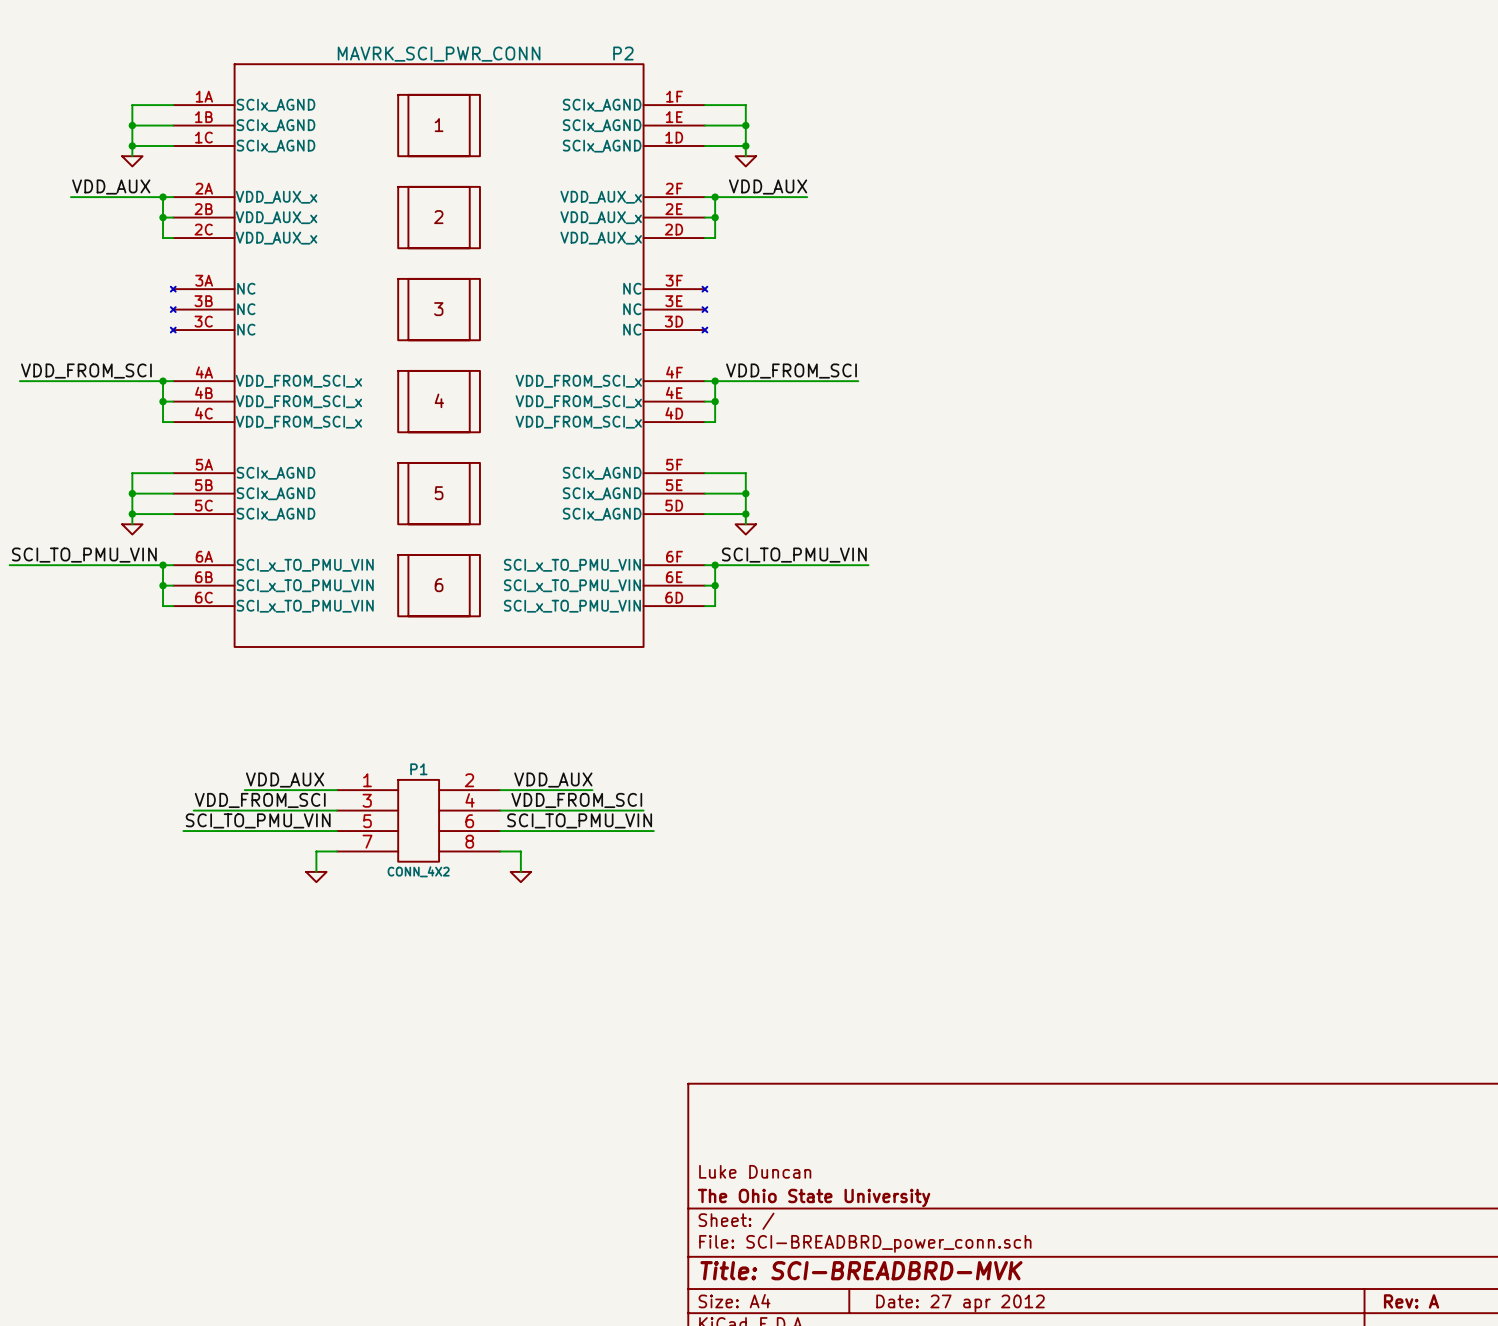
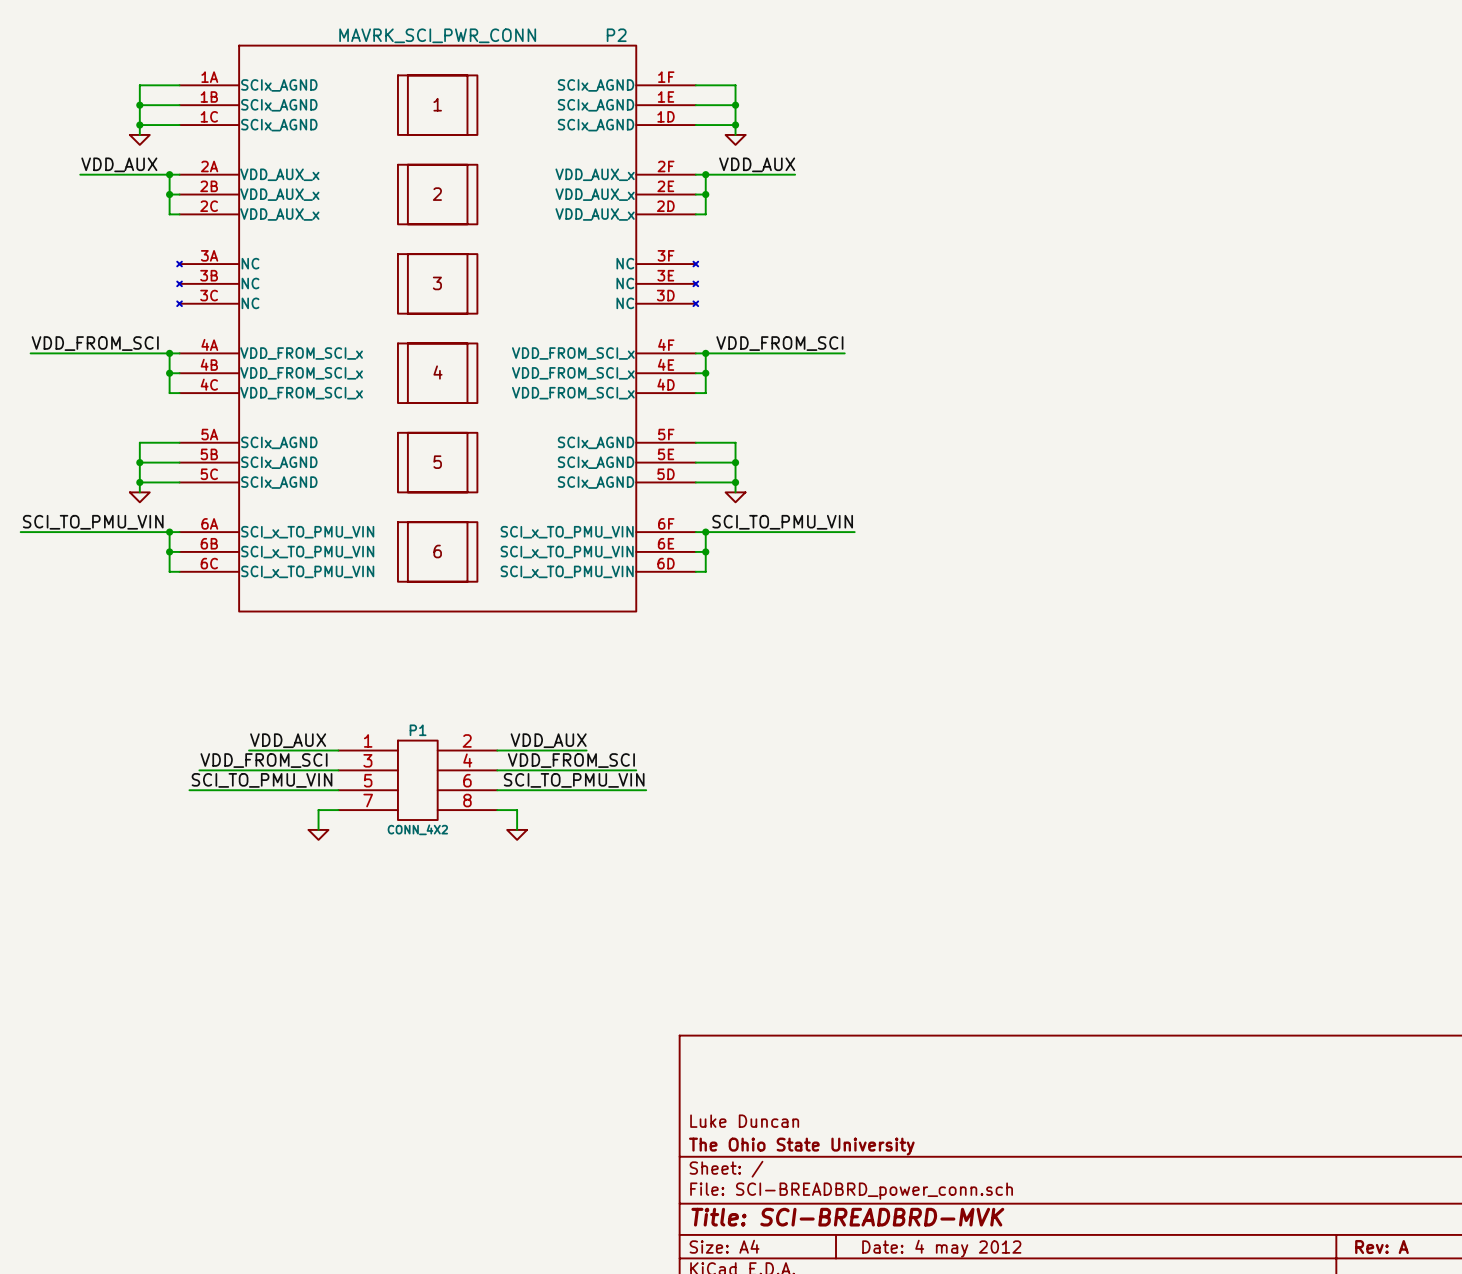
title block: Date: 27 apr 2012 (960, 1303) -> Date: 4 may 2012 (941, 1248)

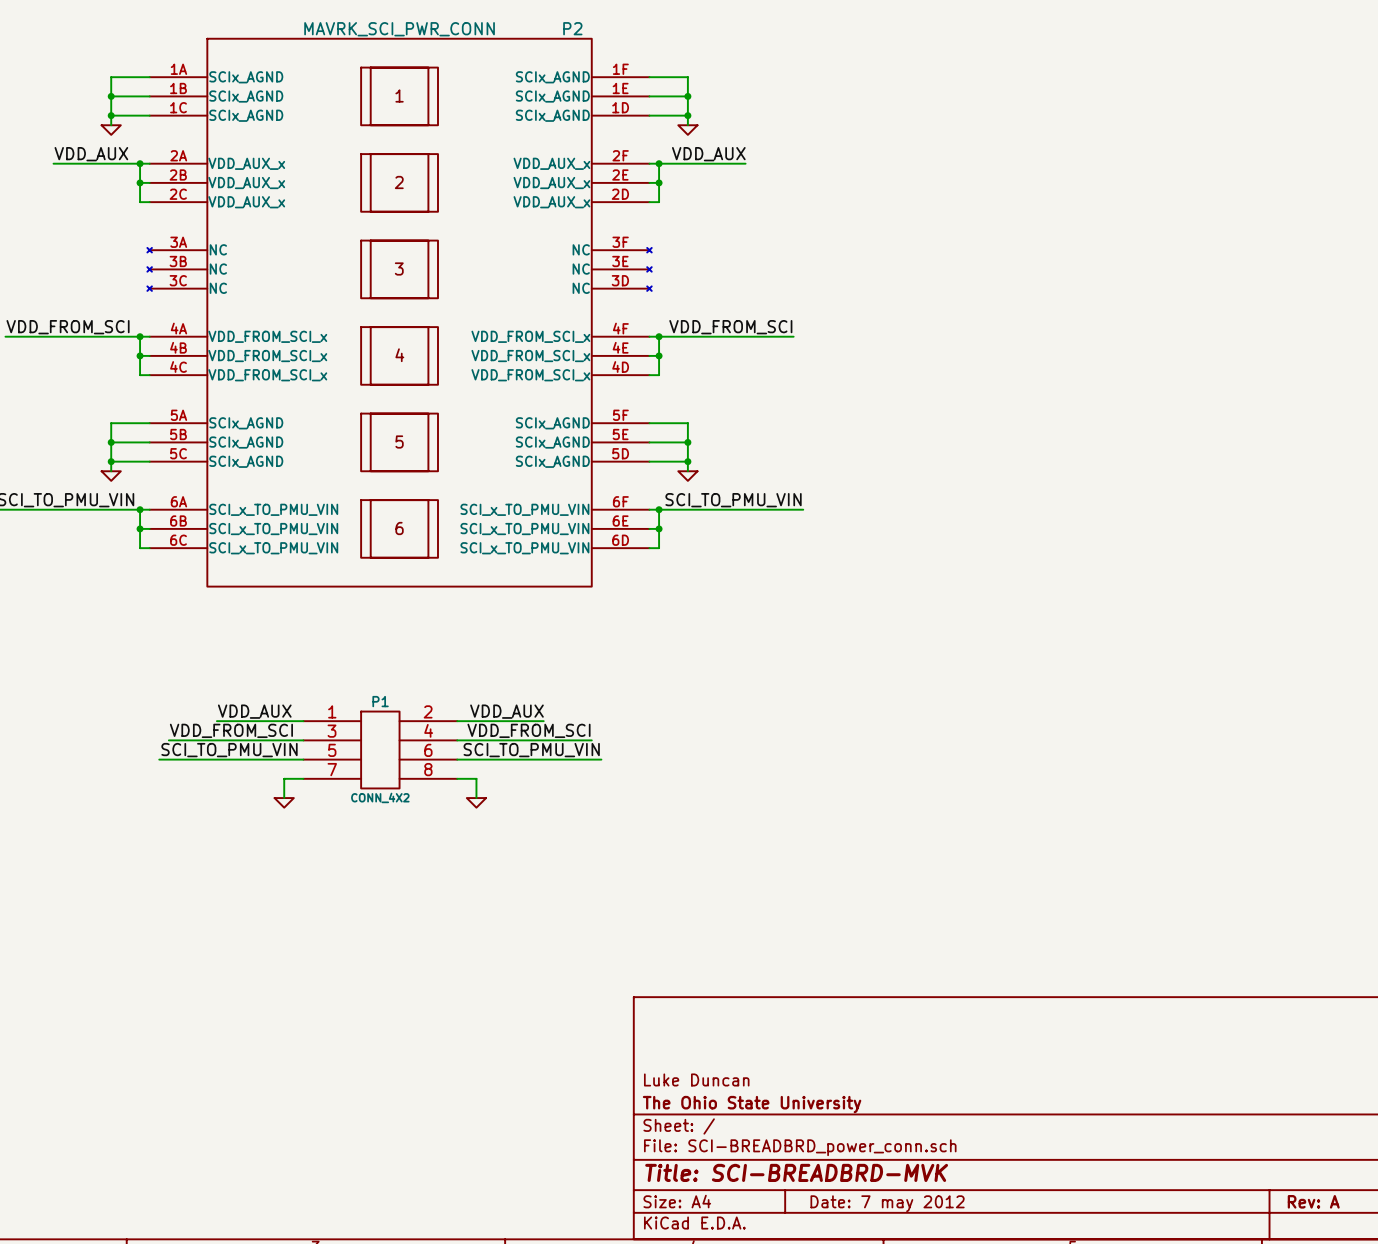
title block: Date: 4 may 2012 (941, 1248) -> Date: 7 may 2012 (887, 1203)

